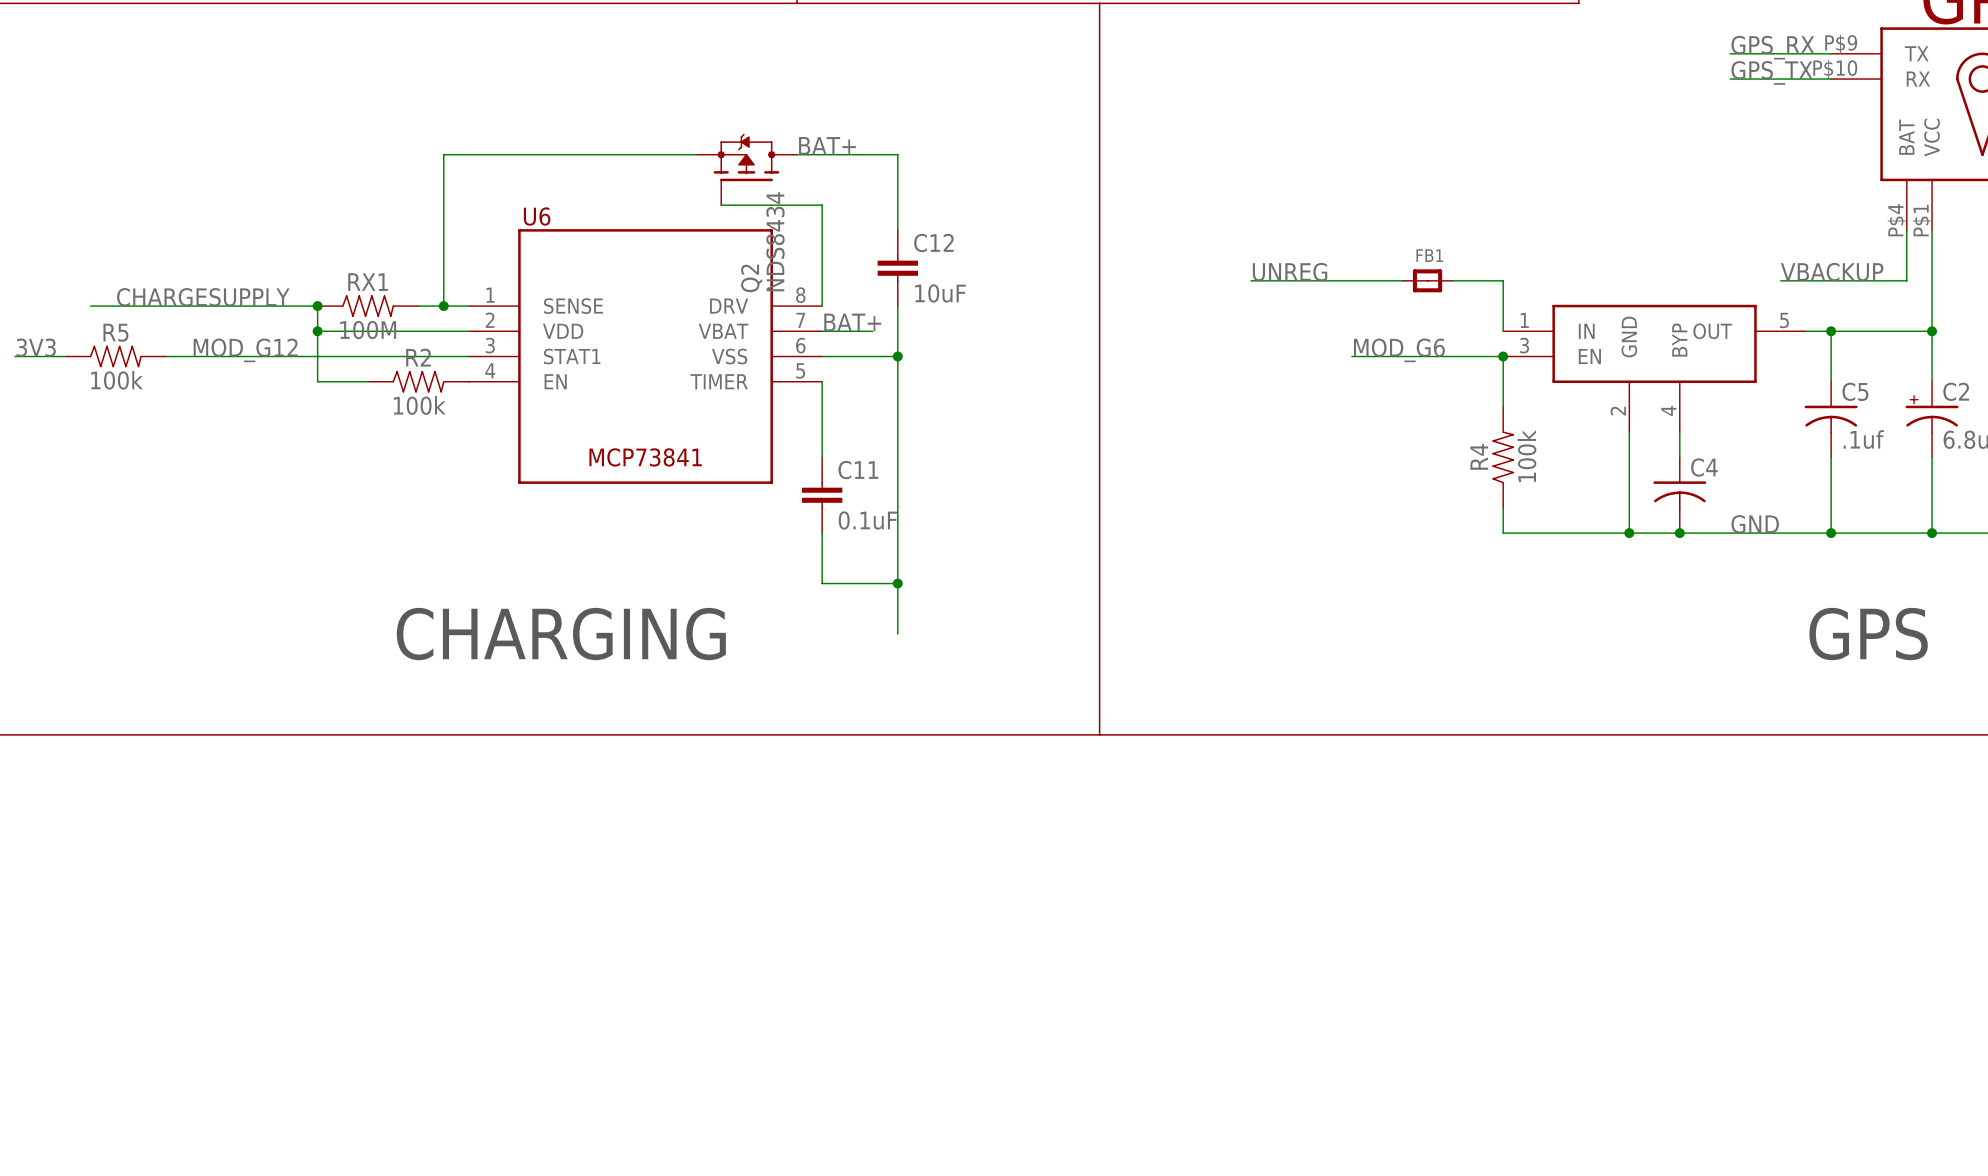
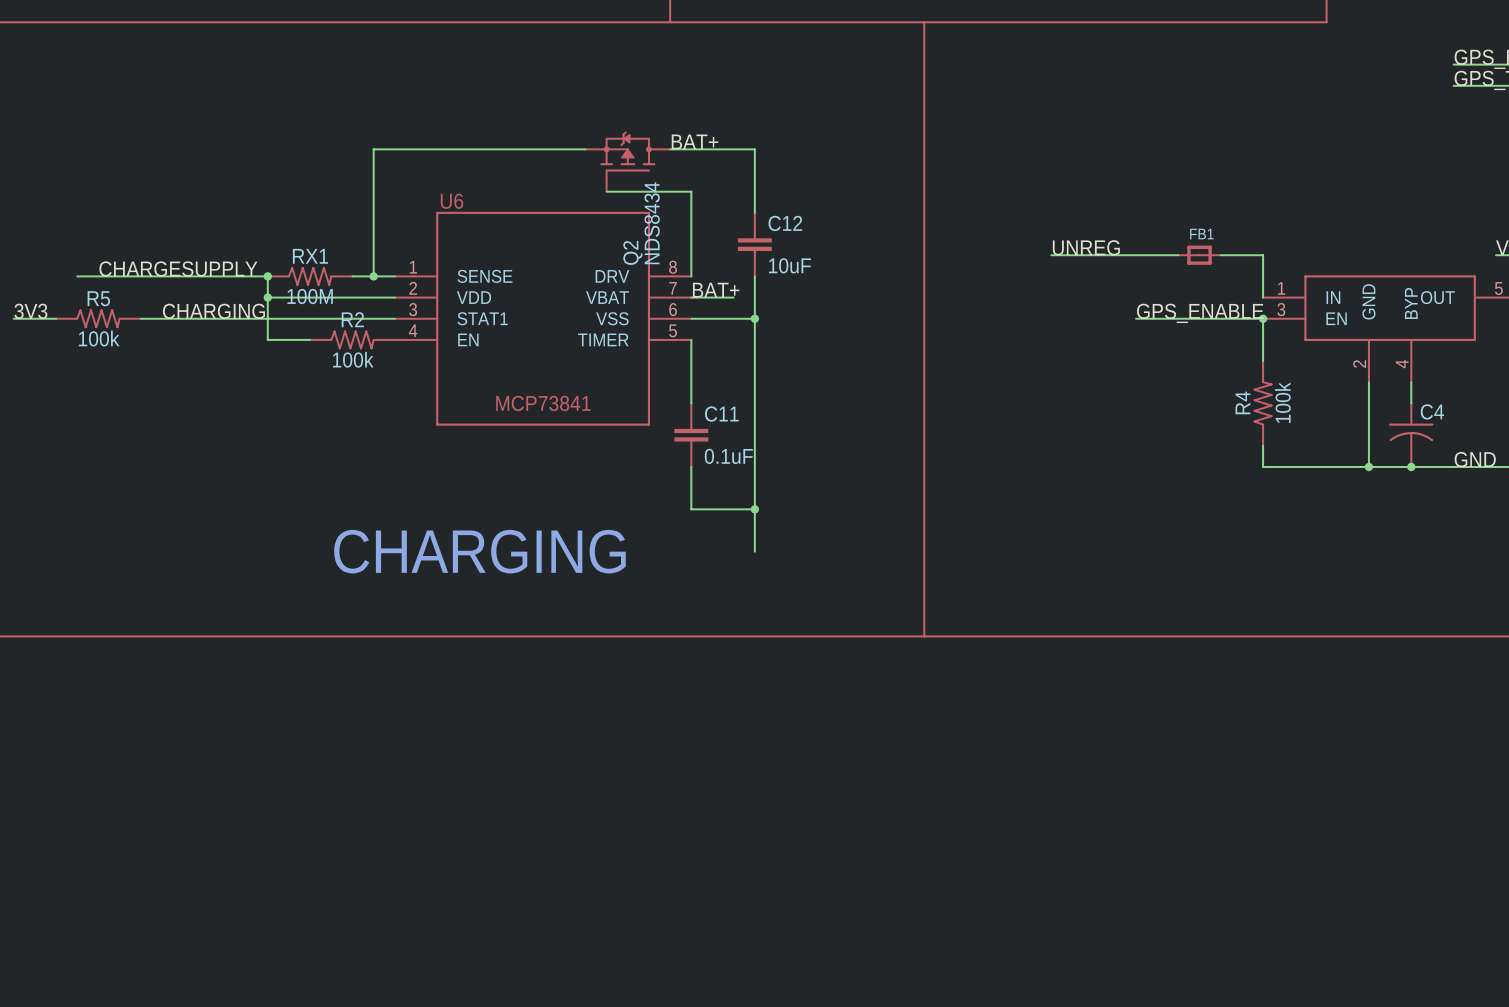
label: MOD_G12 (245, 350) -> CHARGING (213, 311)
label: MOD_G6 (1399, 350) -> GPS_ENABLE (1200, 313)

